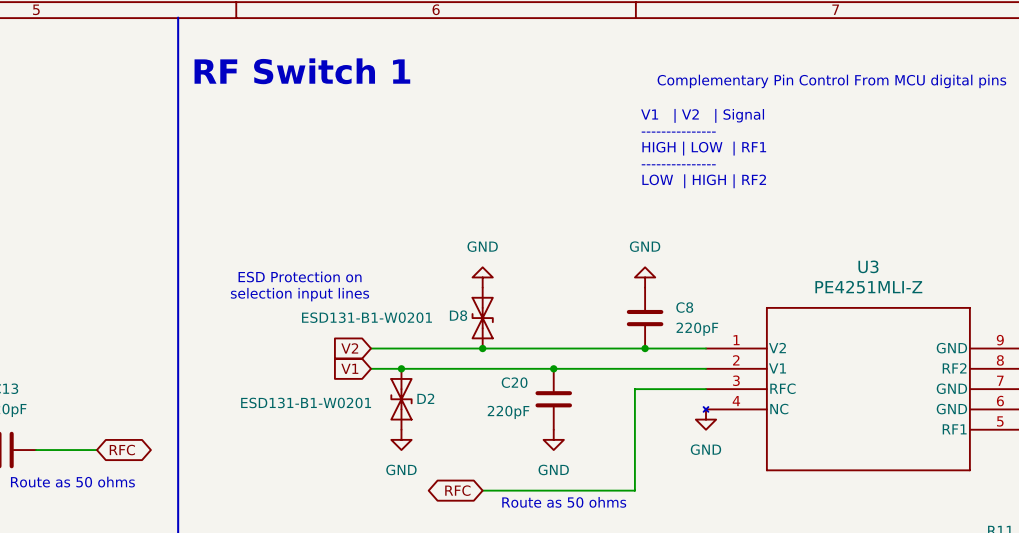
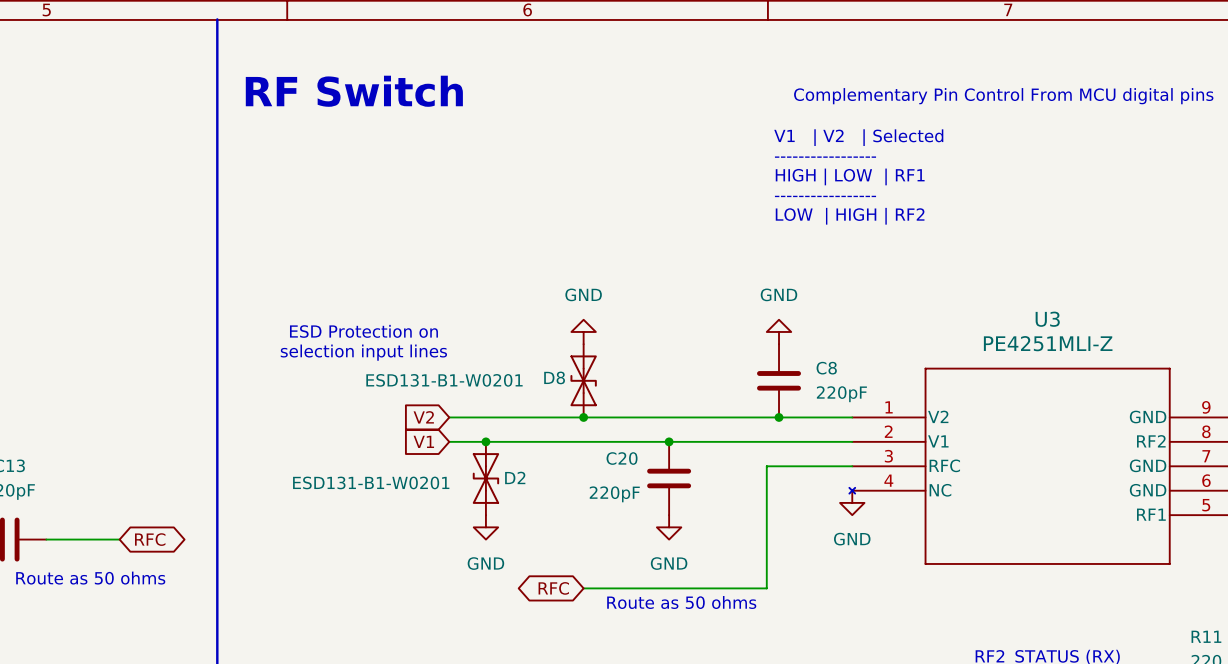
text: RF Switch 1 (302, 71) -> RF Switch (354, 91)
text: V1 | V2 | Signal (702, 115) -> V1 | V2 | Selected (858, 137)
text: --------------- (678, 132) -> ----------------- (825, 157)
text: --------------- (678, 164) -> ----------------- (825, 196)

